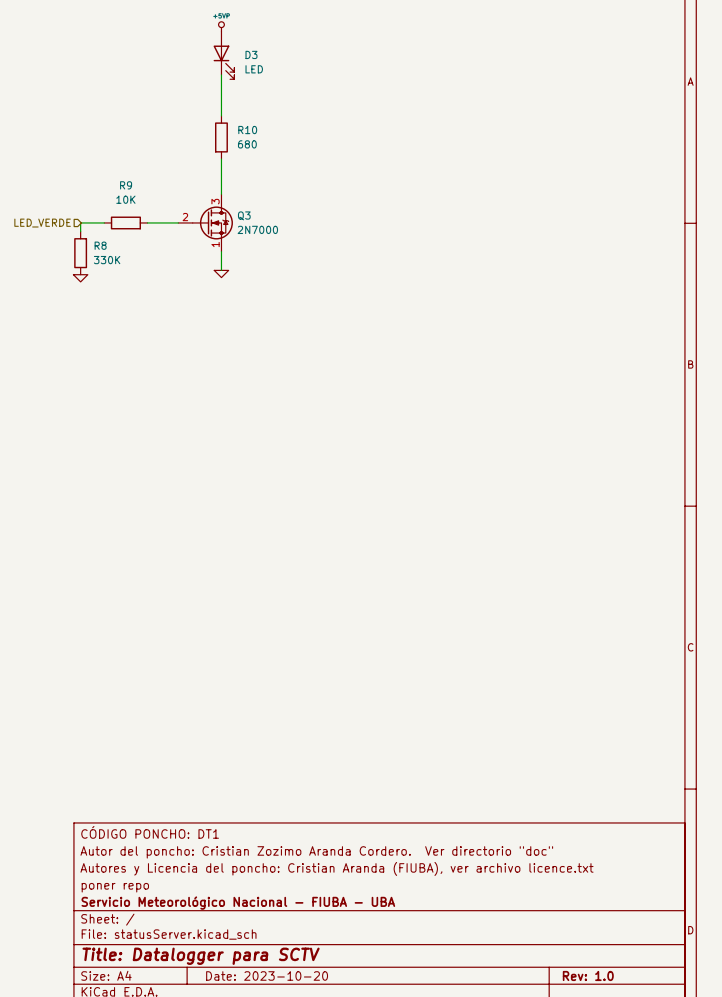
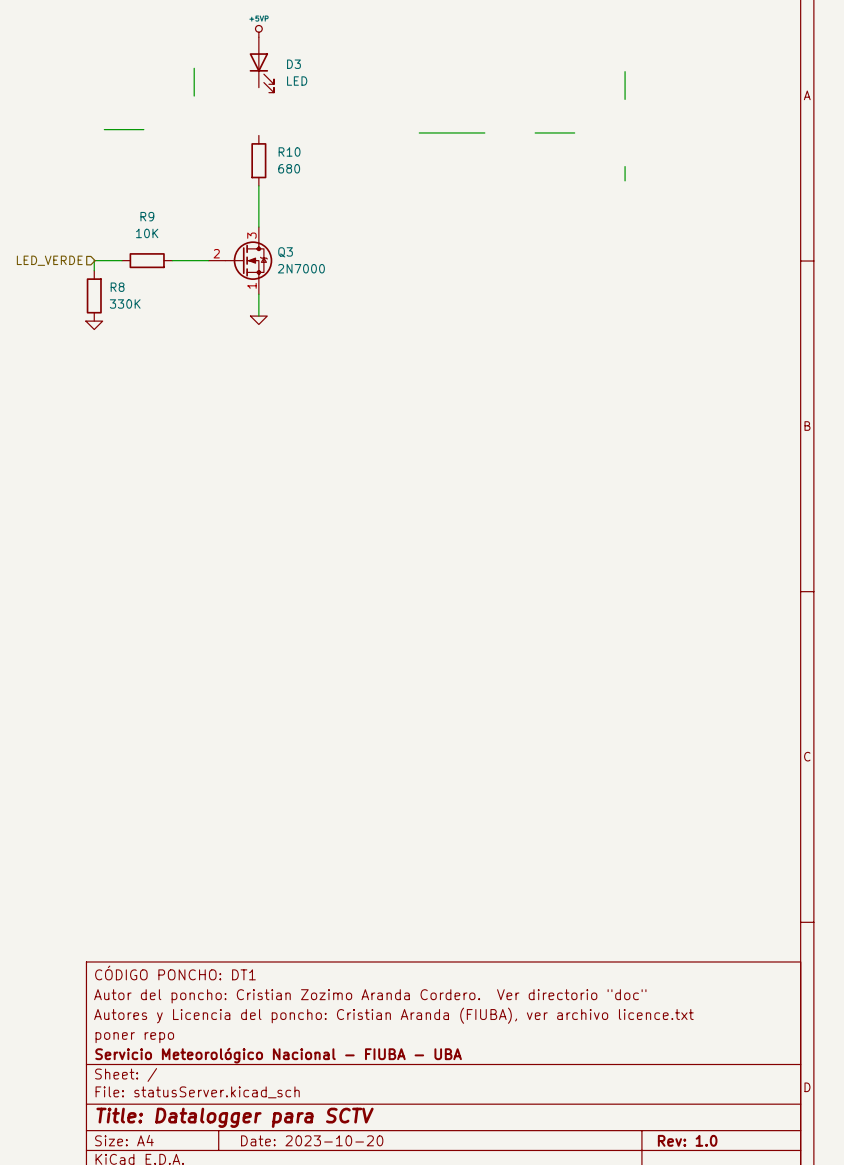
wire: none -> (194, 68) (194, 96)
wire: none -> (625, 71) (625, 99)
wire: (221, 74) (221, 115) -> none
wire: none -> (104, 129) (143, 129)
wire: none -> (419, 132) (484, 132)
wire: none -> (535, 132) (574, 132)
wire: none -> (625, 166) (625, 180)

